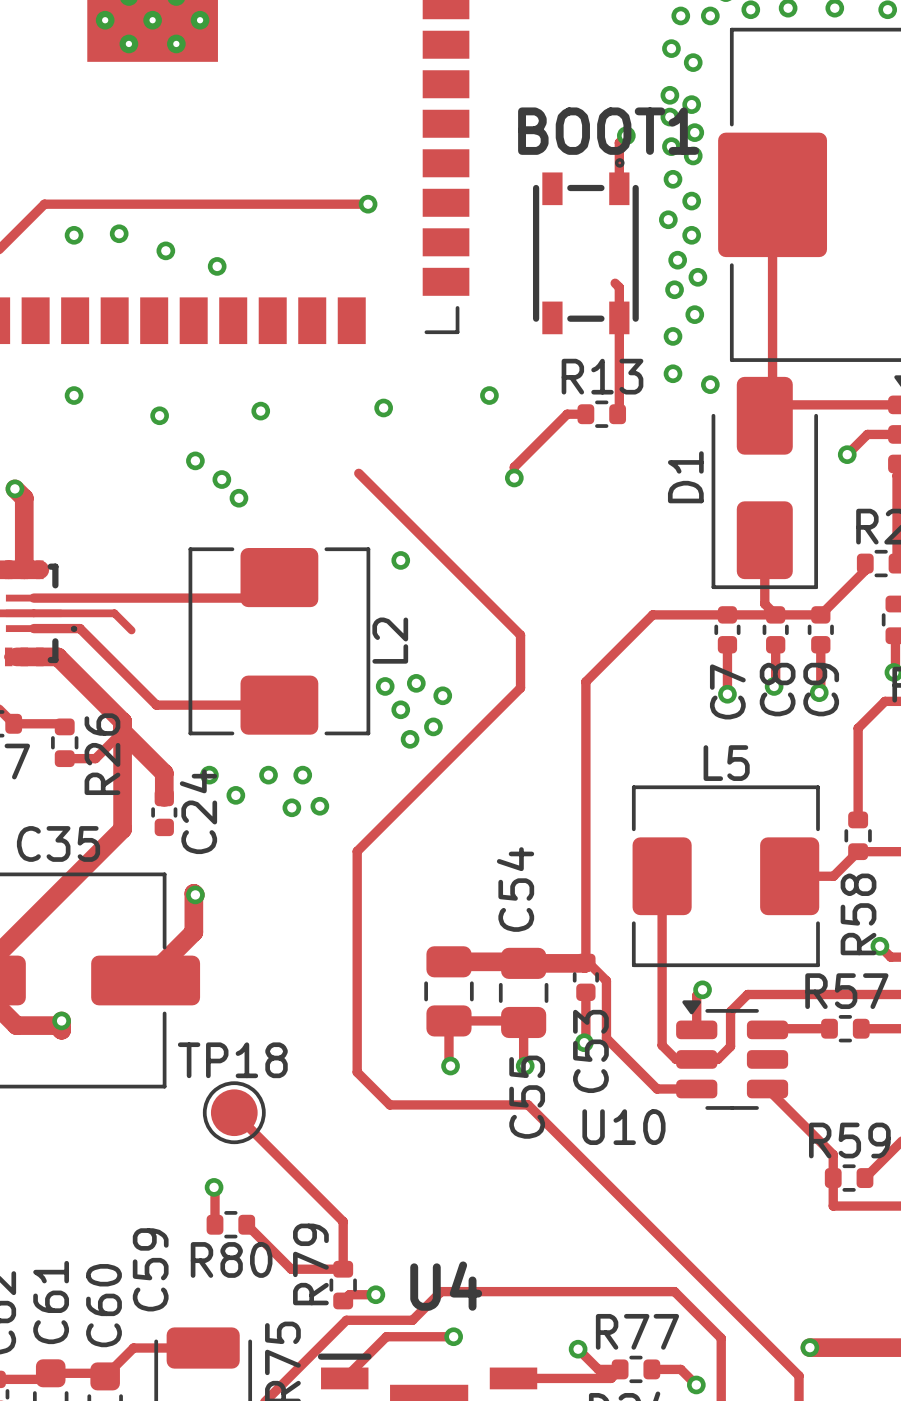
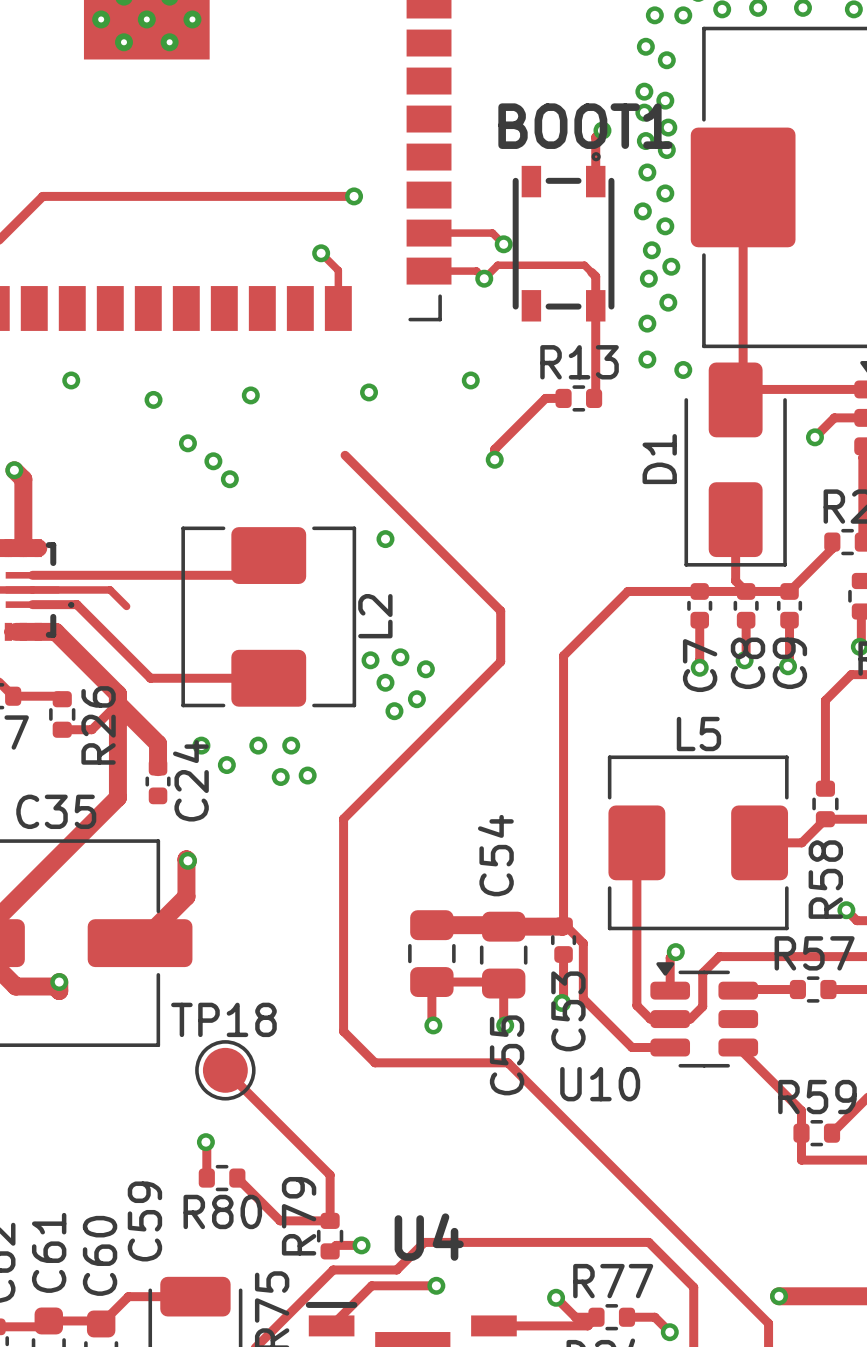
via: (119, 233) -> none
via: (74, 235) -> none
track: none -> (429, 233) (492, 233) (503, 244)
via: (165, 250) -> none
via: none -> (503, 244)
track: none -> (321, 253) (338, 270) (338, 308)
via: none -> (321, 253)
via: (217, 266) -> none
track: none -> (429, 271) (476, 271) (484, 278) (497, 265) (584, 265) (591, 272)
via: none -> (484, 278)

